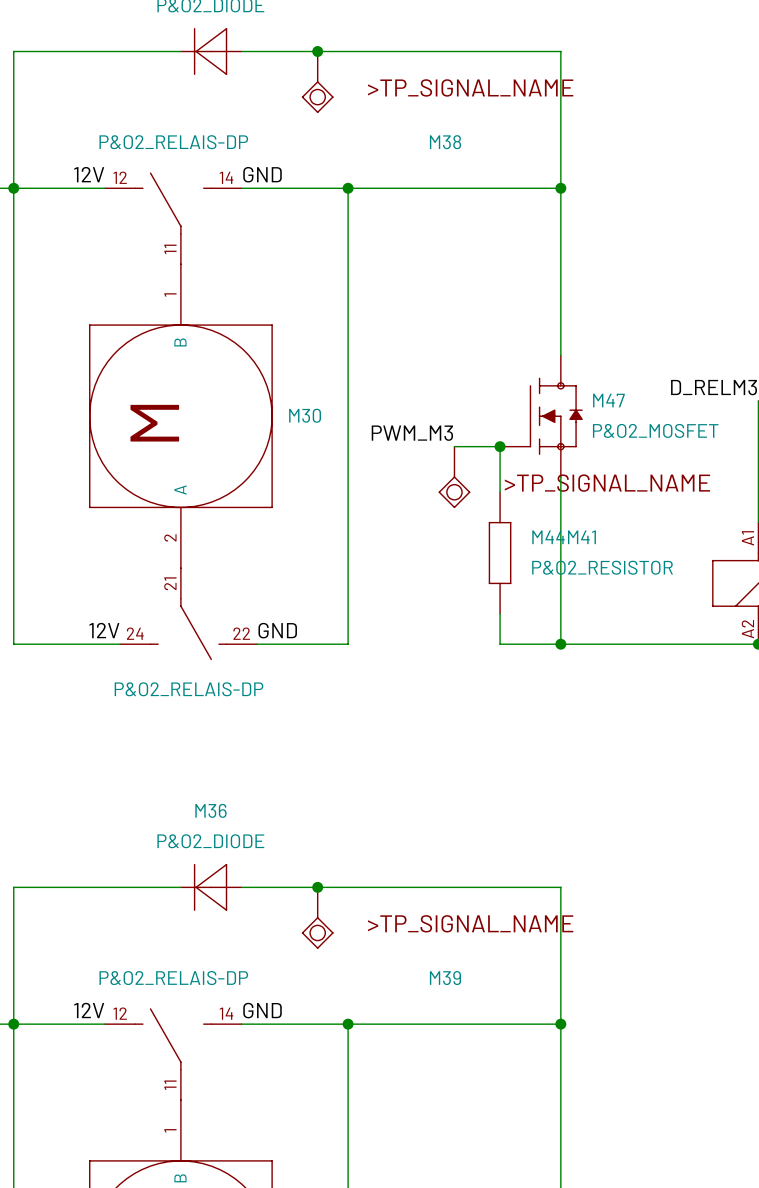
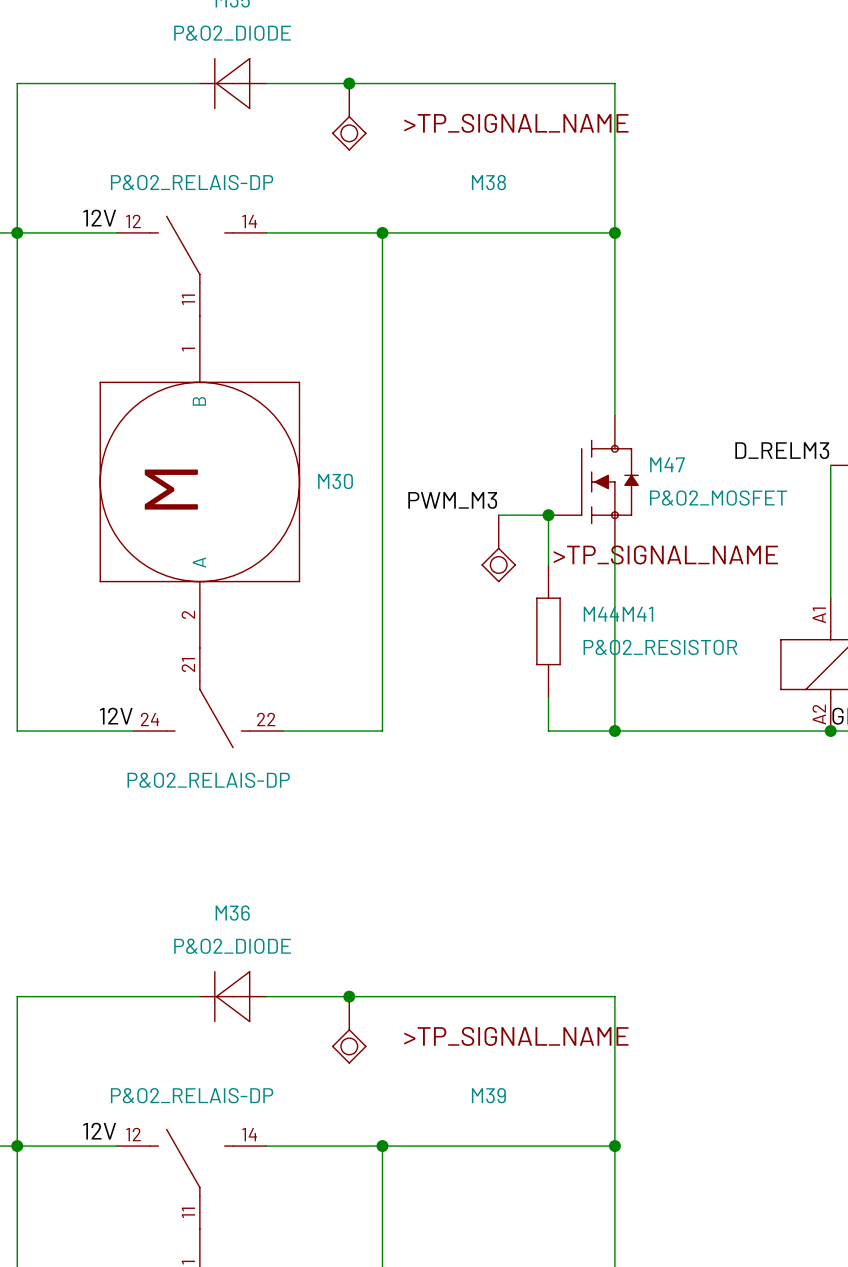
label: GND (262, 174) -> none
label: GND (277, 630) -> none
label: GND (262, 1010) -> none

